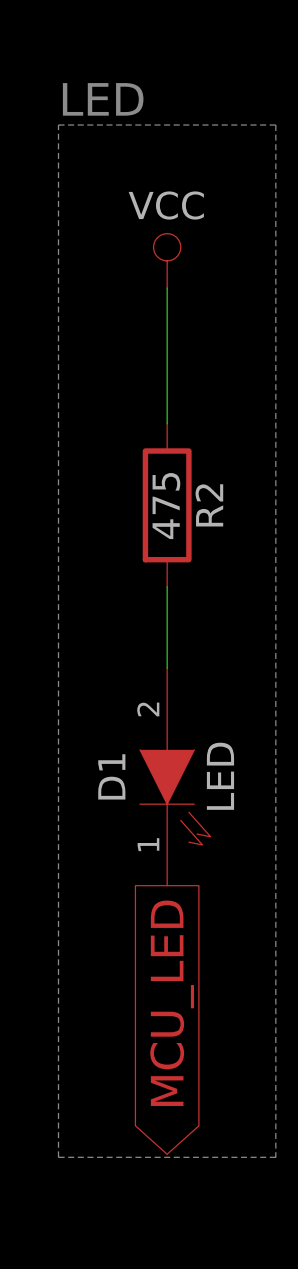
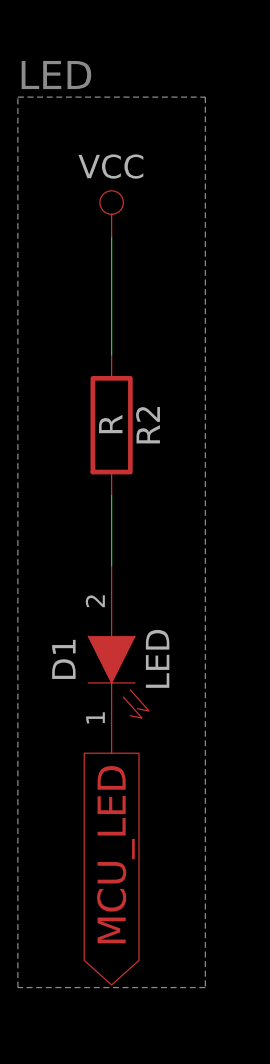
R2 value: 475 (166, 506) -> R (110, 424)

